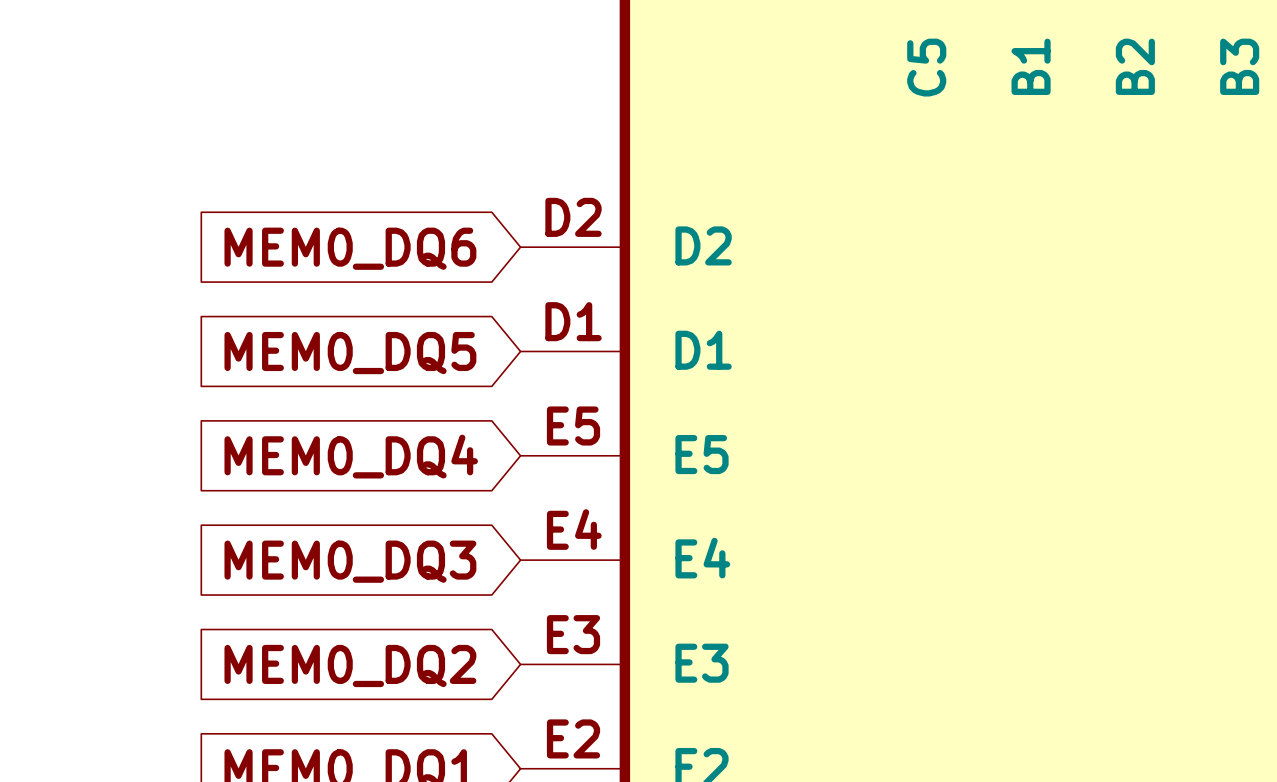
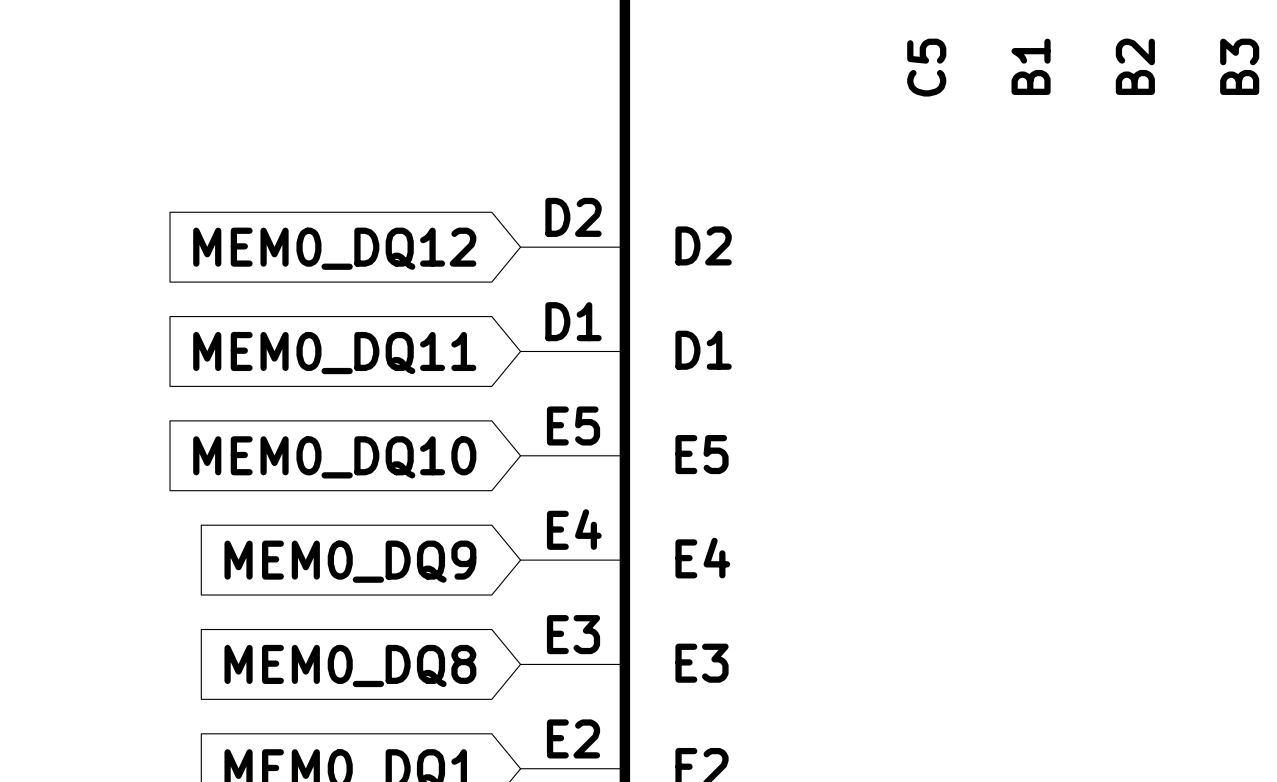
global label: MEM0_DQ6 (350, 248) -> MEM0_DQ12 (334, 248)
global label: MEM0_DQ5 (350, 353) -> MEM0_DQ11 (334, 353)
global label: MEM0_DQ4 (351, 456) -> MEM0_DQ10 (334, 457)
global label: MEM0_DQ3 (350, 561) -> MEM0_DQ9 (350, 561)
global label: MEM0_DQ2 (350, 665) -> MEM0_DQ8 (350, 665)

